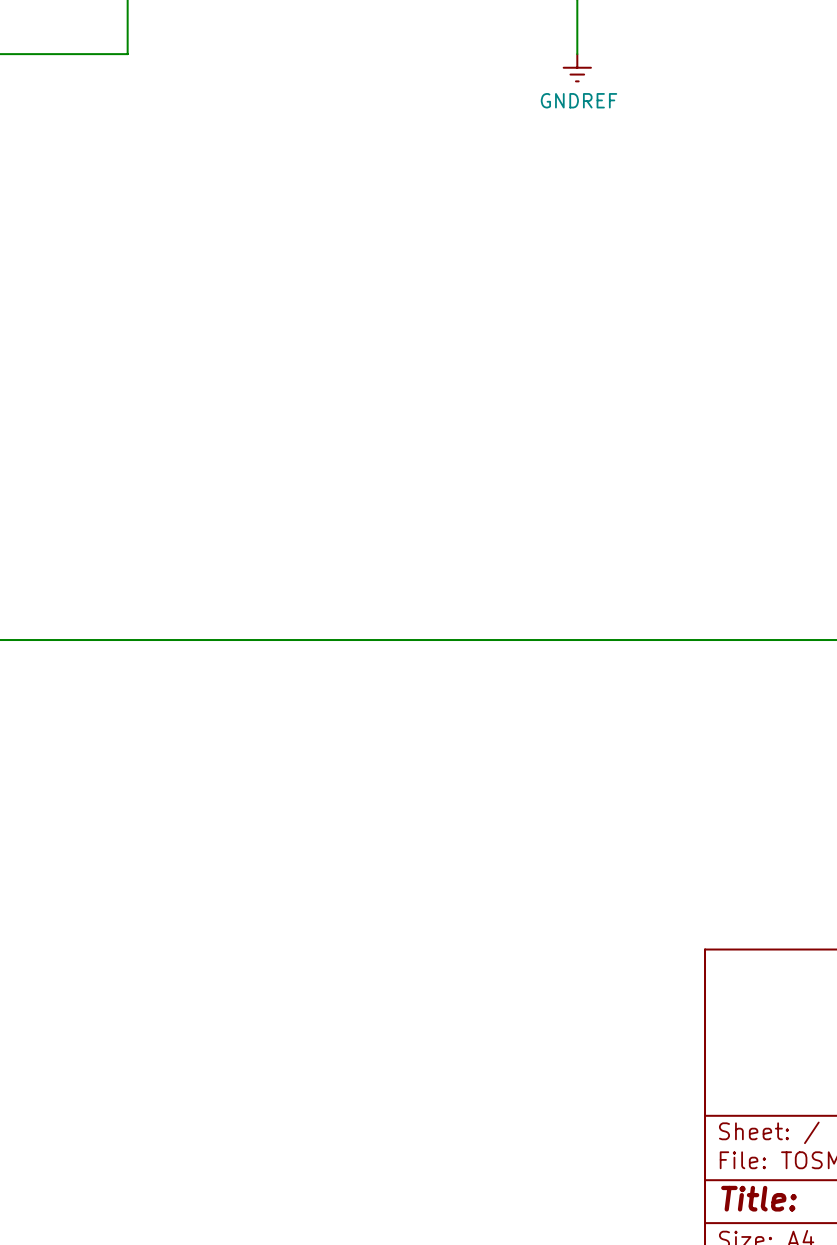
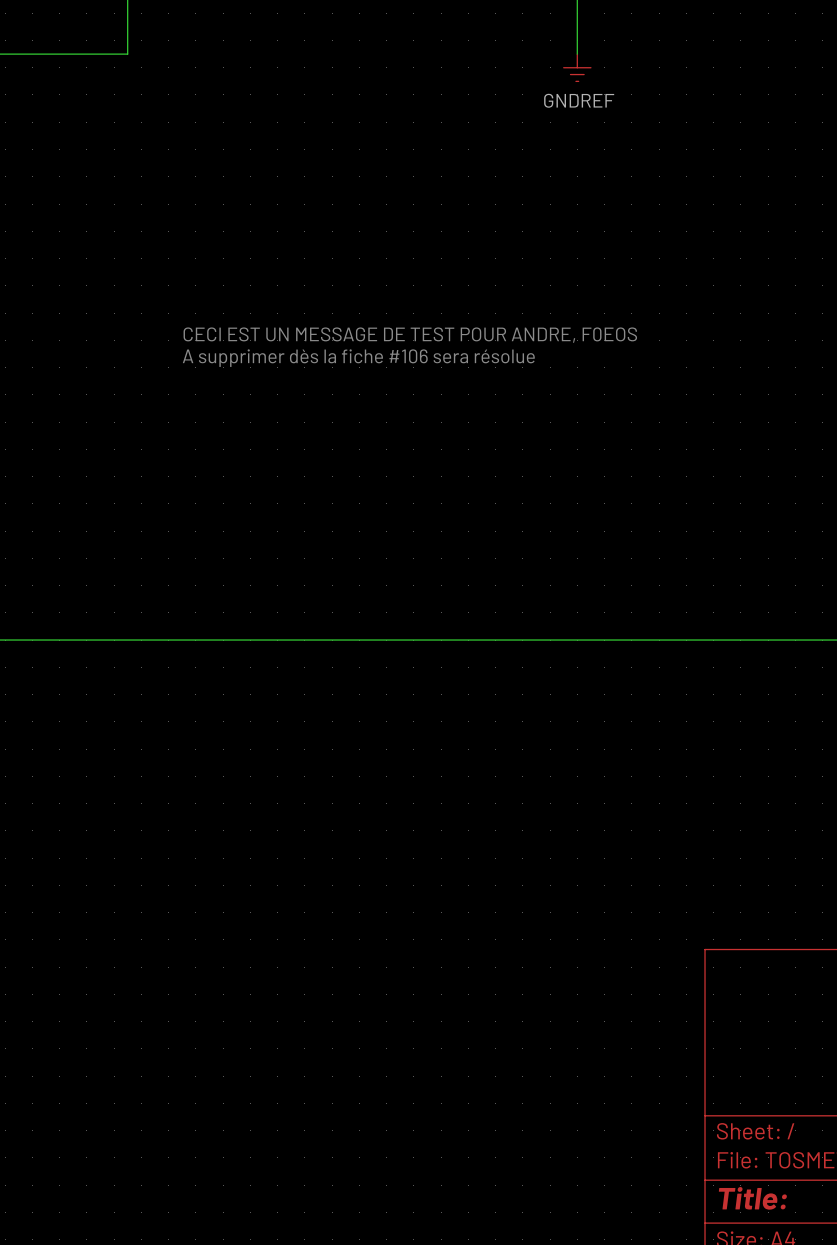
text: none -> CECI EST UN MESSAGE DE TEST POUR ANDRE, F0EOS (410, 335)
text: none -> A supprimer dès la fiche #106 sera résolue (358, 358)

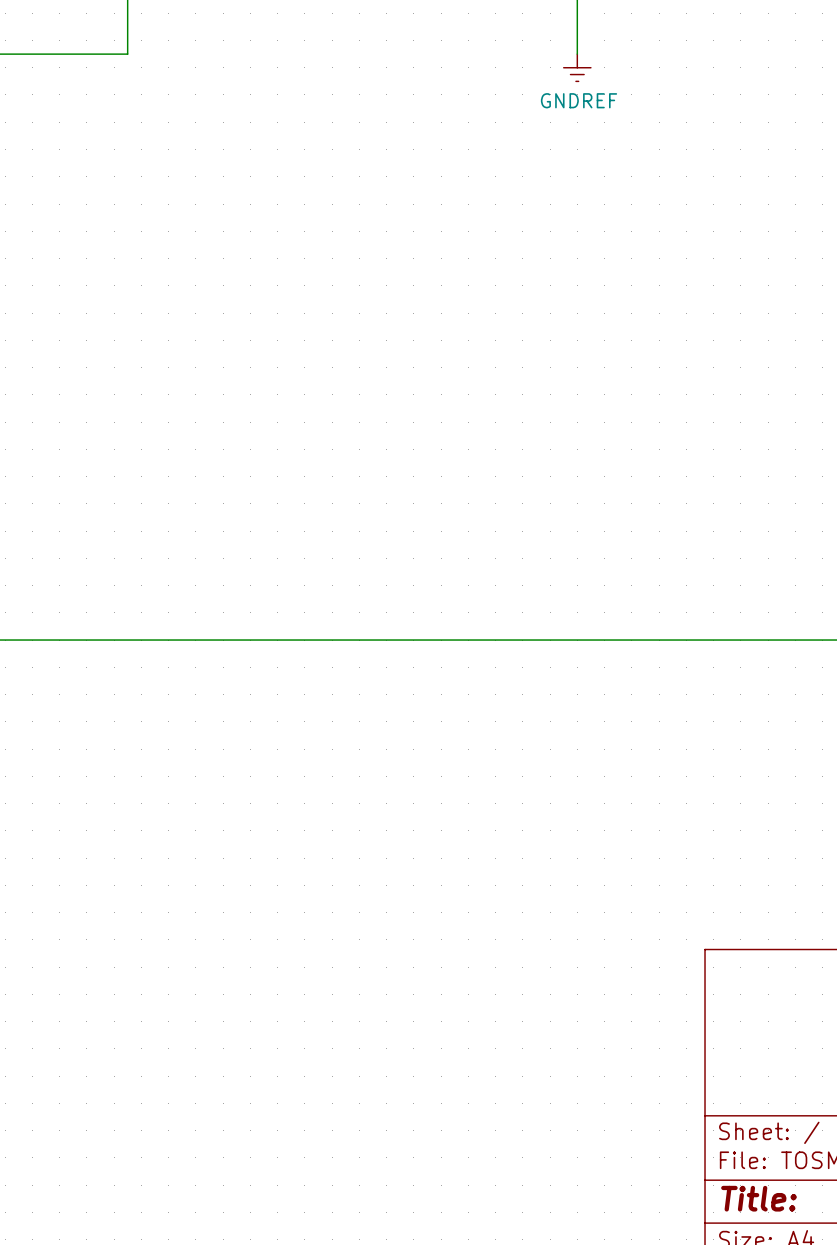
text: CECI EST UN MESSAGE DE TEST POUR ANDRE, F0EOS (410, 335) -> none
text: A supprimer dès la fiche #106 sera résolue (358, 358) -> none

